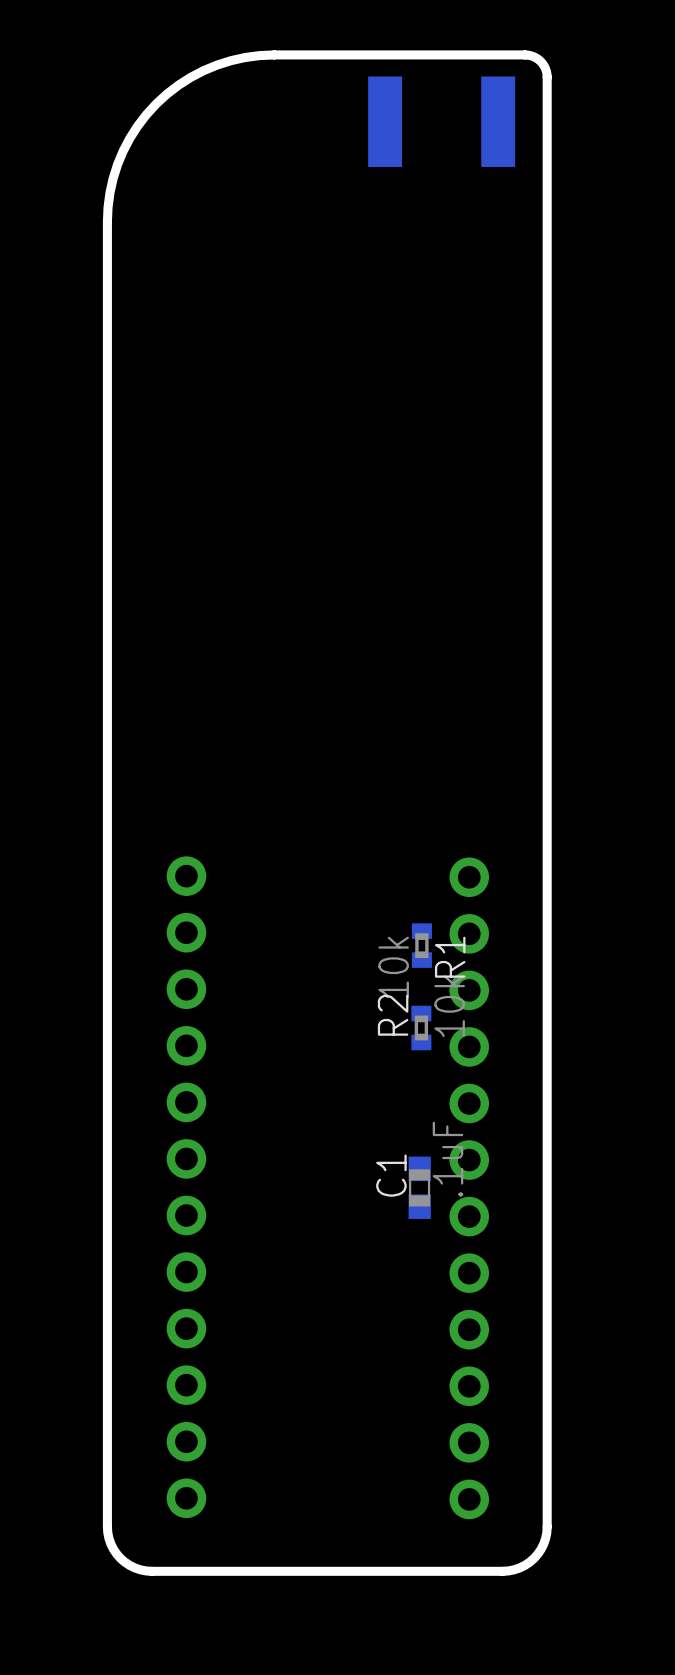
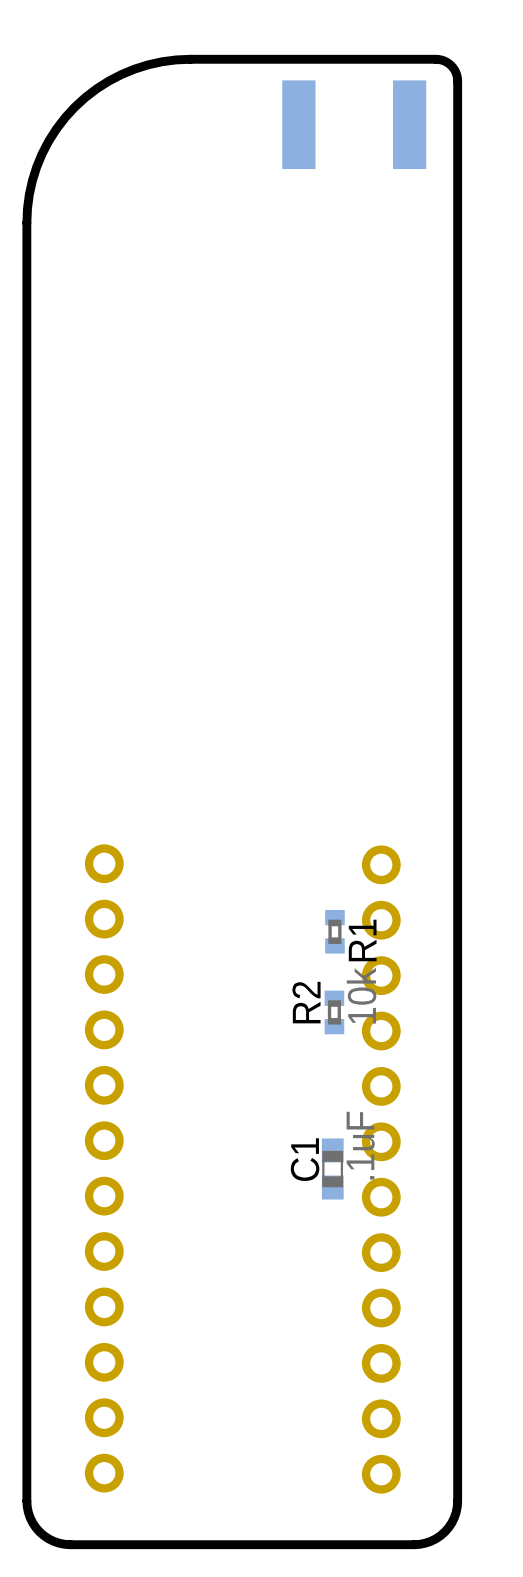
R1 value: 10k (393, 967) -> none

